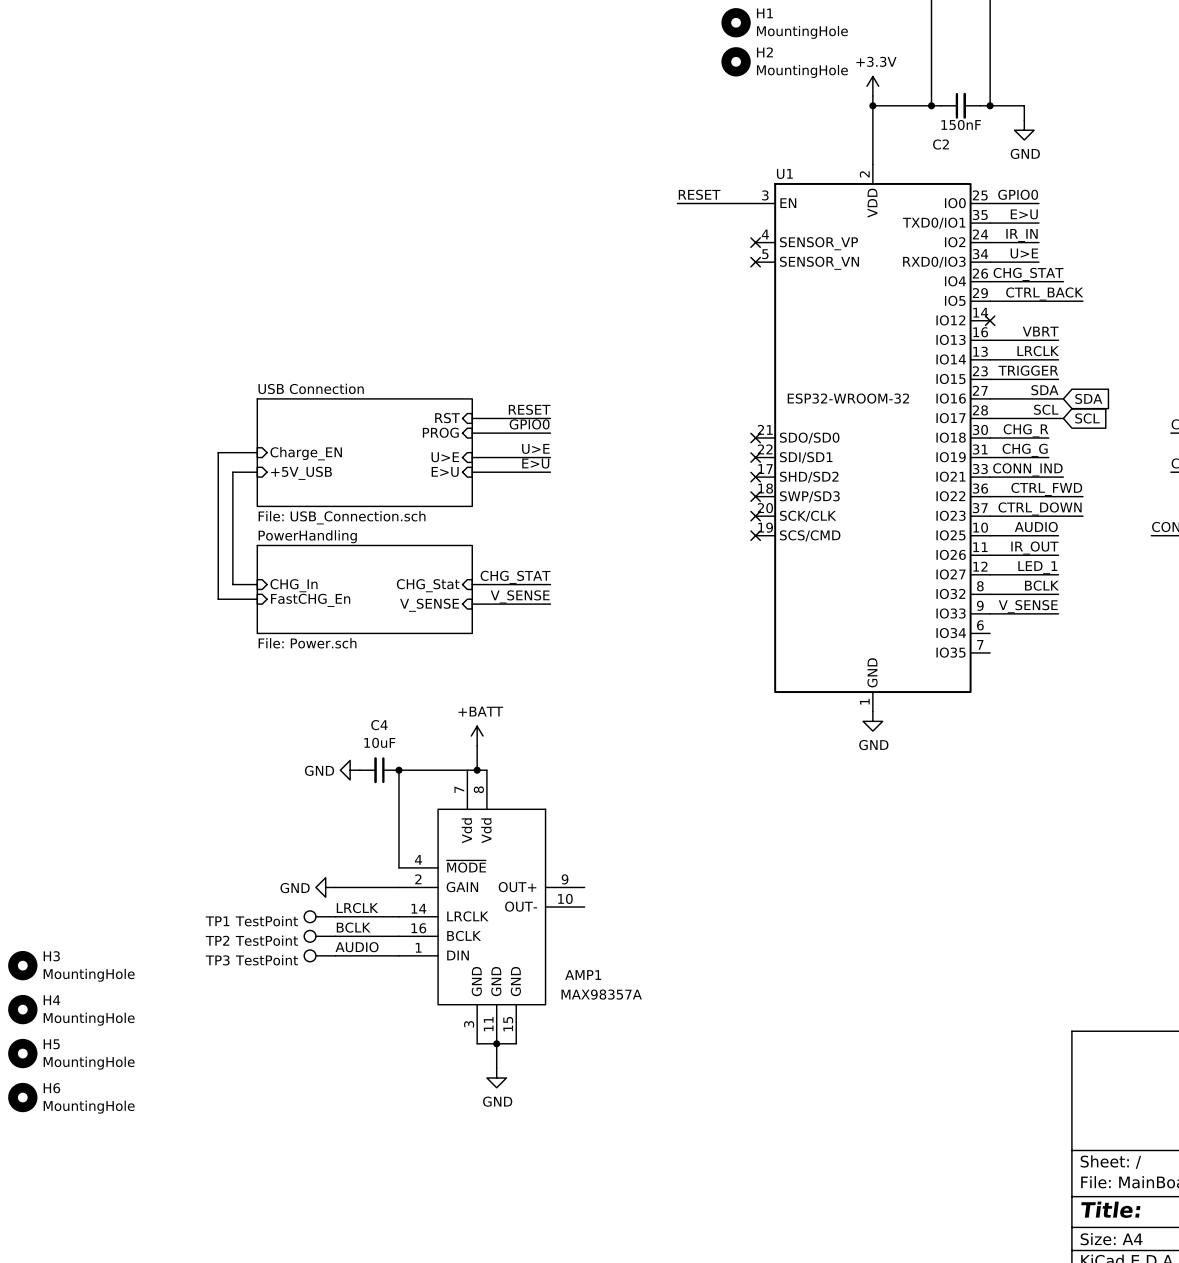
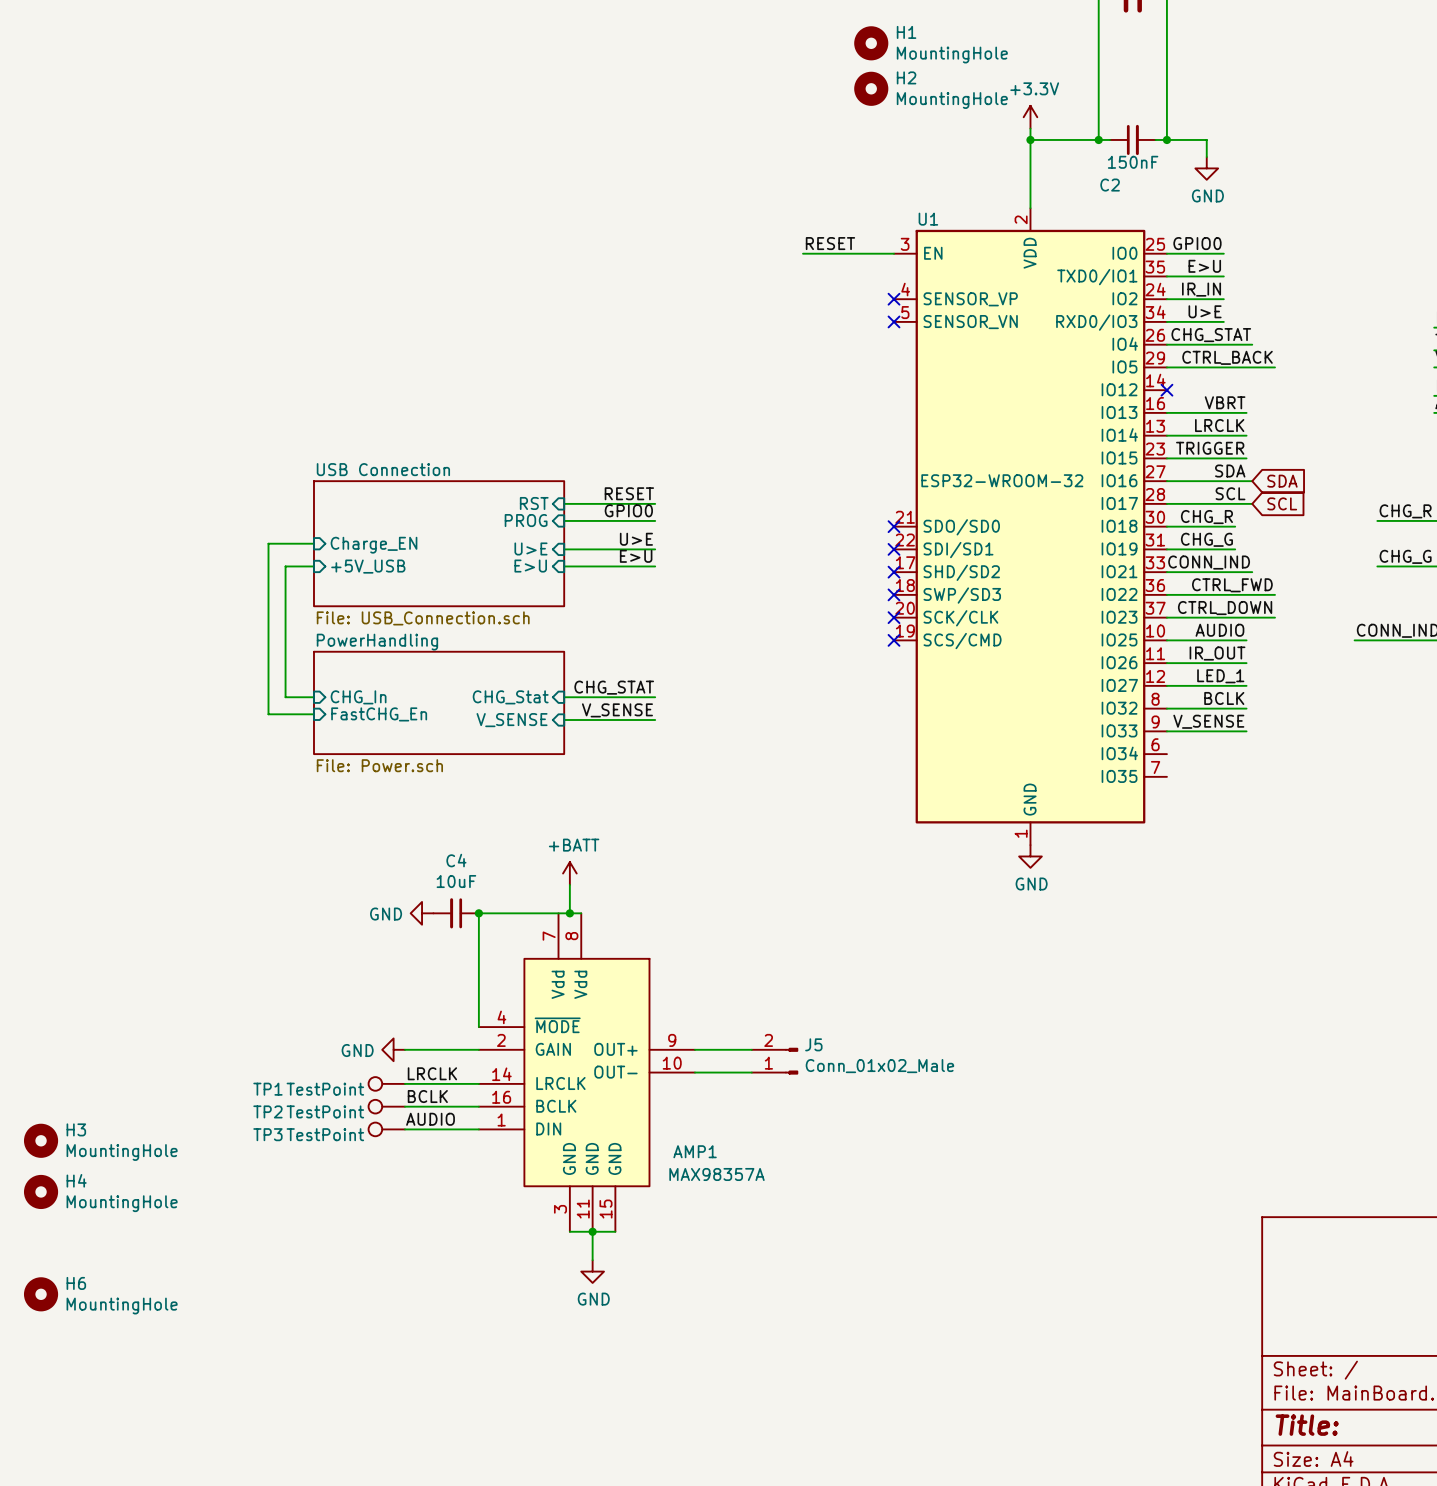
wire: none -> (694, 1049) (751, 1049)
J5: none -> Conn_01x02_Male (774, 1061)
wire: none -> (694, 1072) (751, 1072)
H5: MountingHole (22, 1053) -> none

